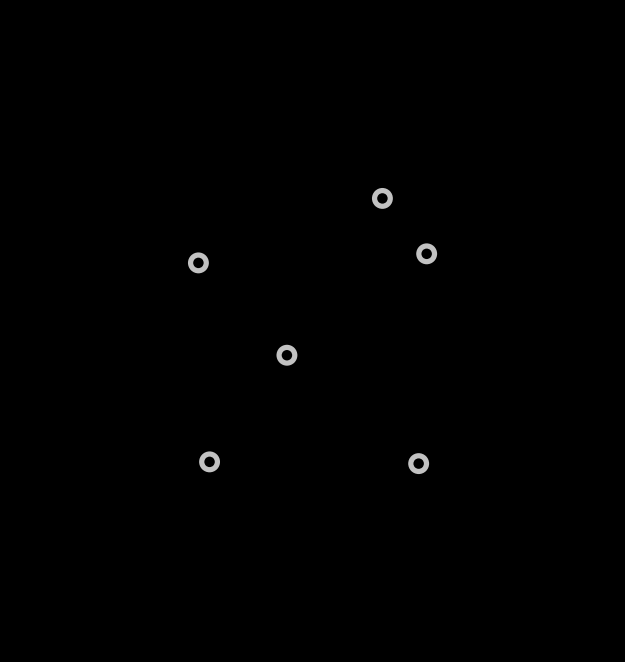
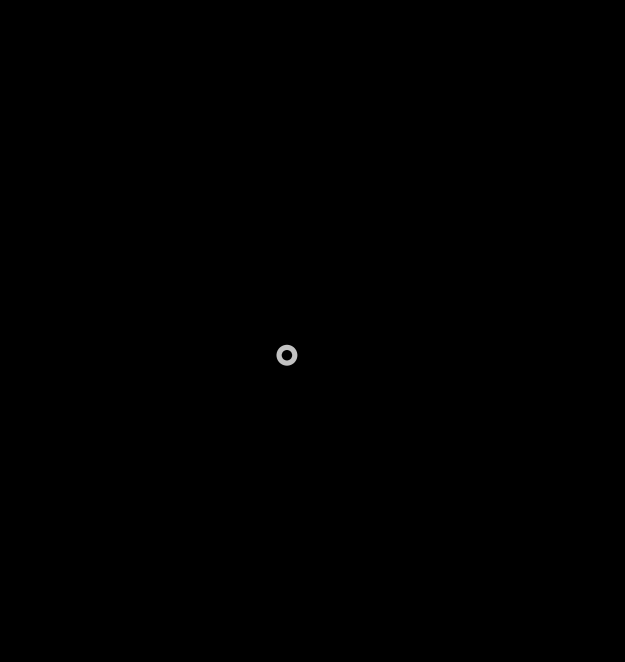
via: (382, 198) -> none
via: (426, 253) -> none
via: (198, 262) -> none
via: (209, 461) -> none
via: (418, 463) -> none

